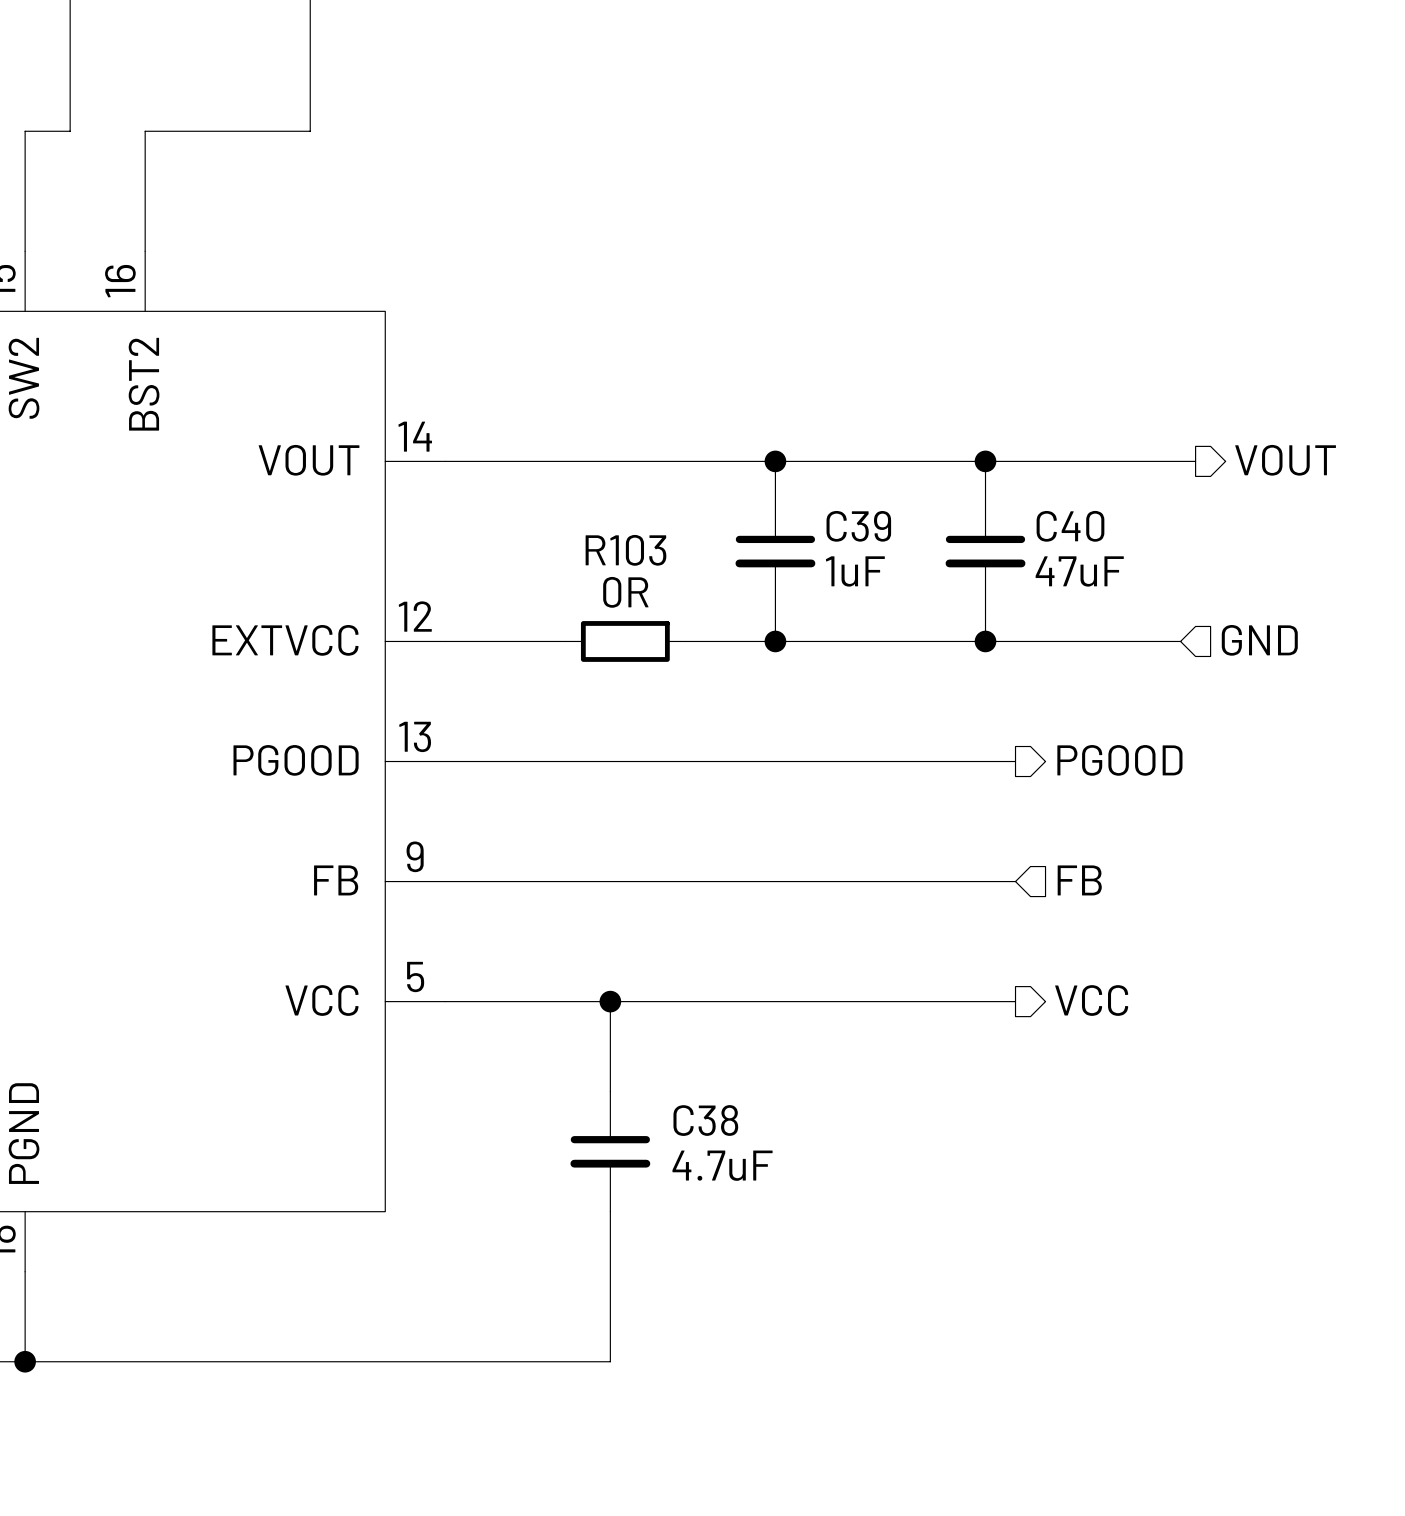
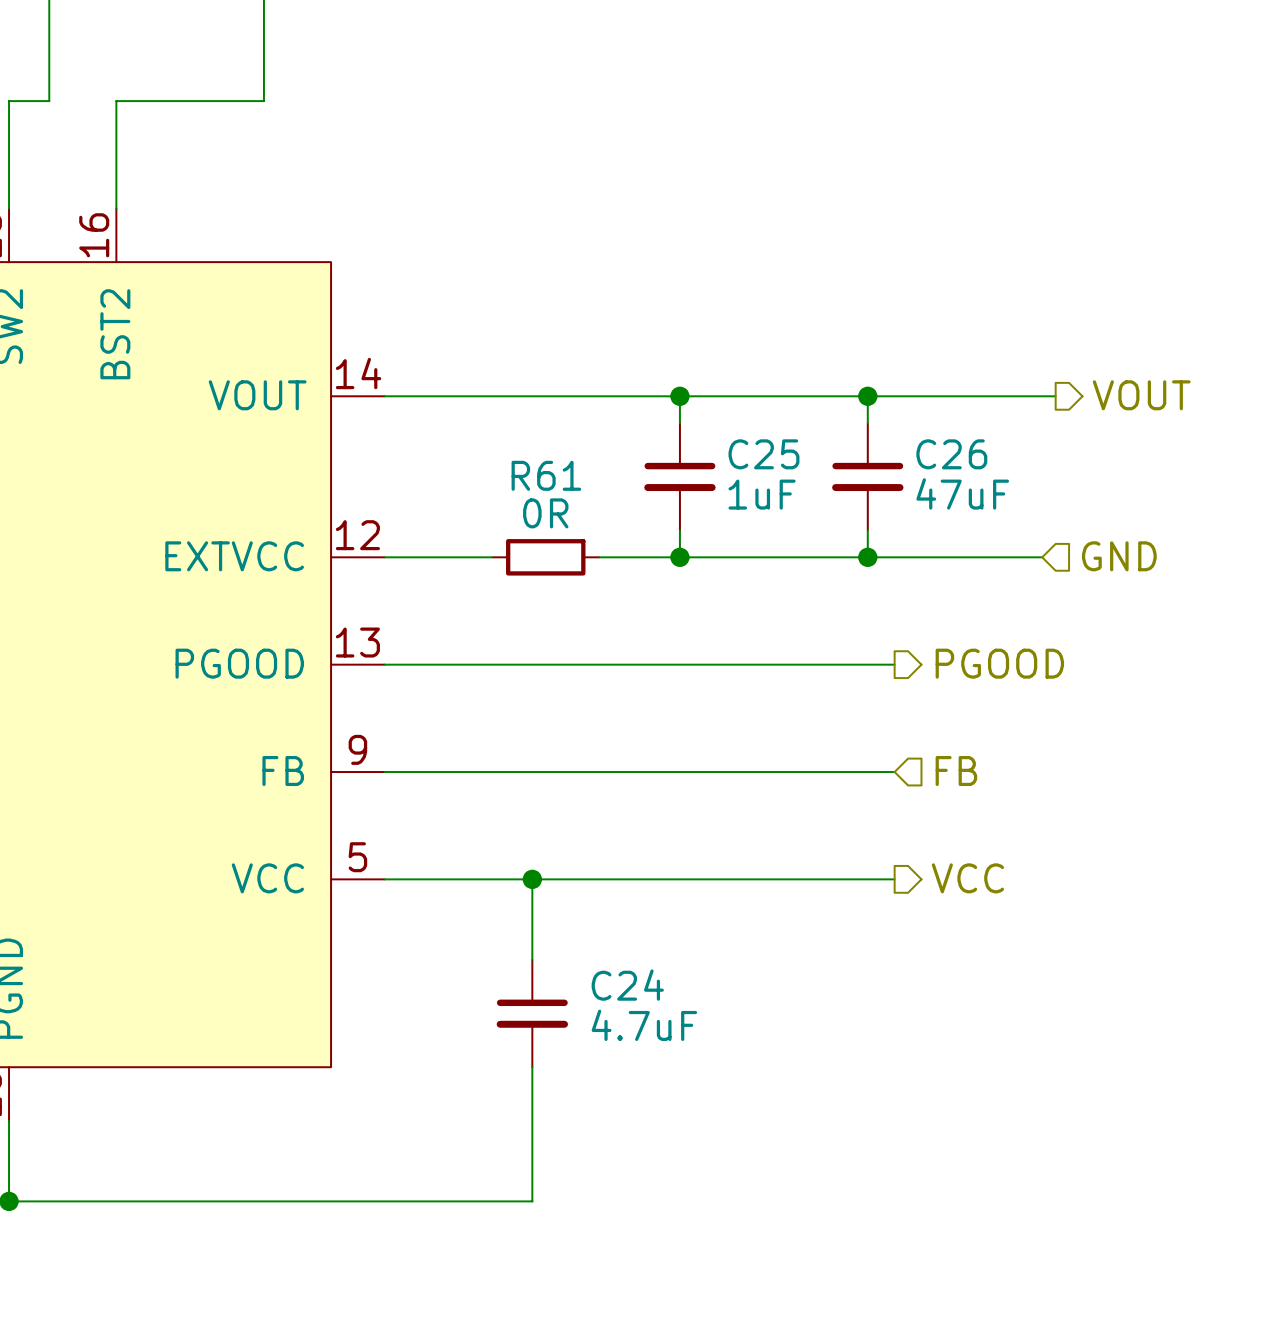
C39 name: C39 (858, 526) -> C25 (763, 454)
C40 name: C40 (1070, 526) -> C26 (951, 454)
R103 name: R103 (625, 550) -> R61 (546, 475)
C38 name: C38 (705, 1120) -> C24 (627, 985)

